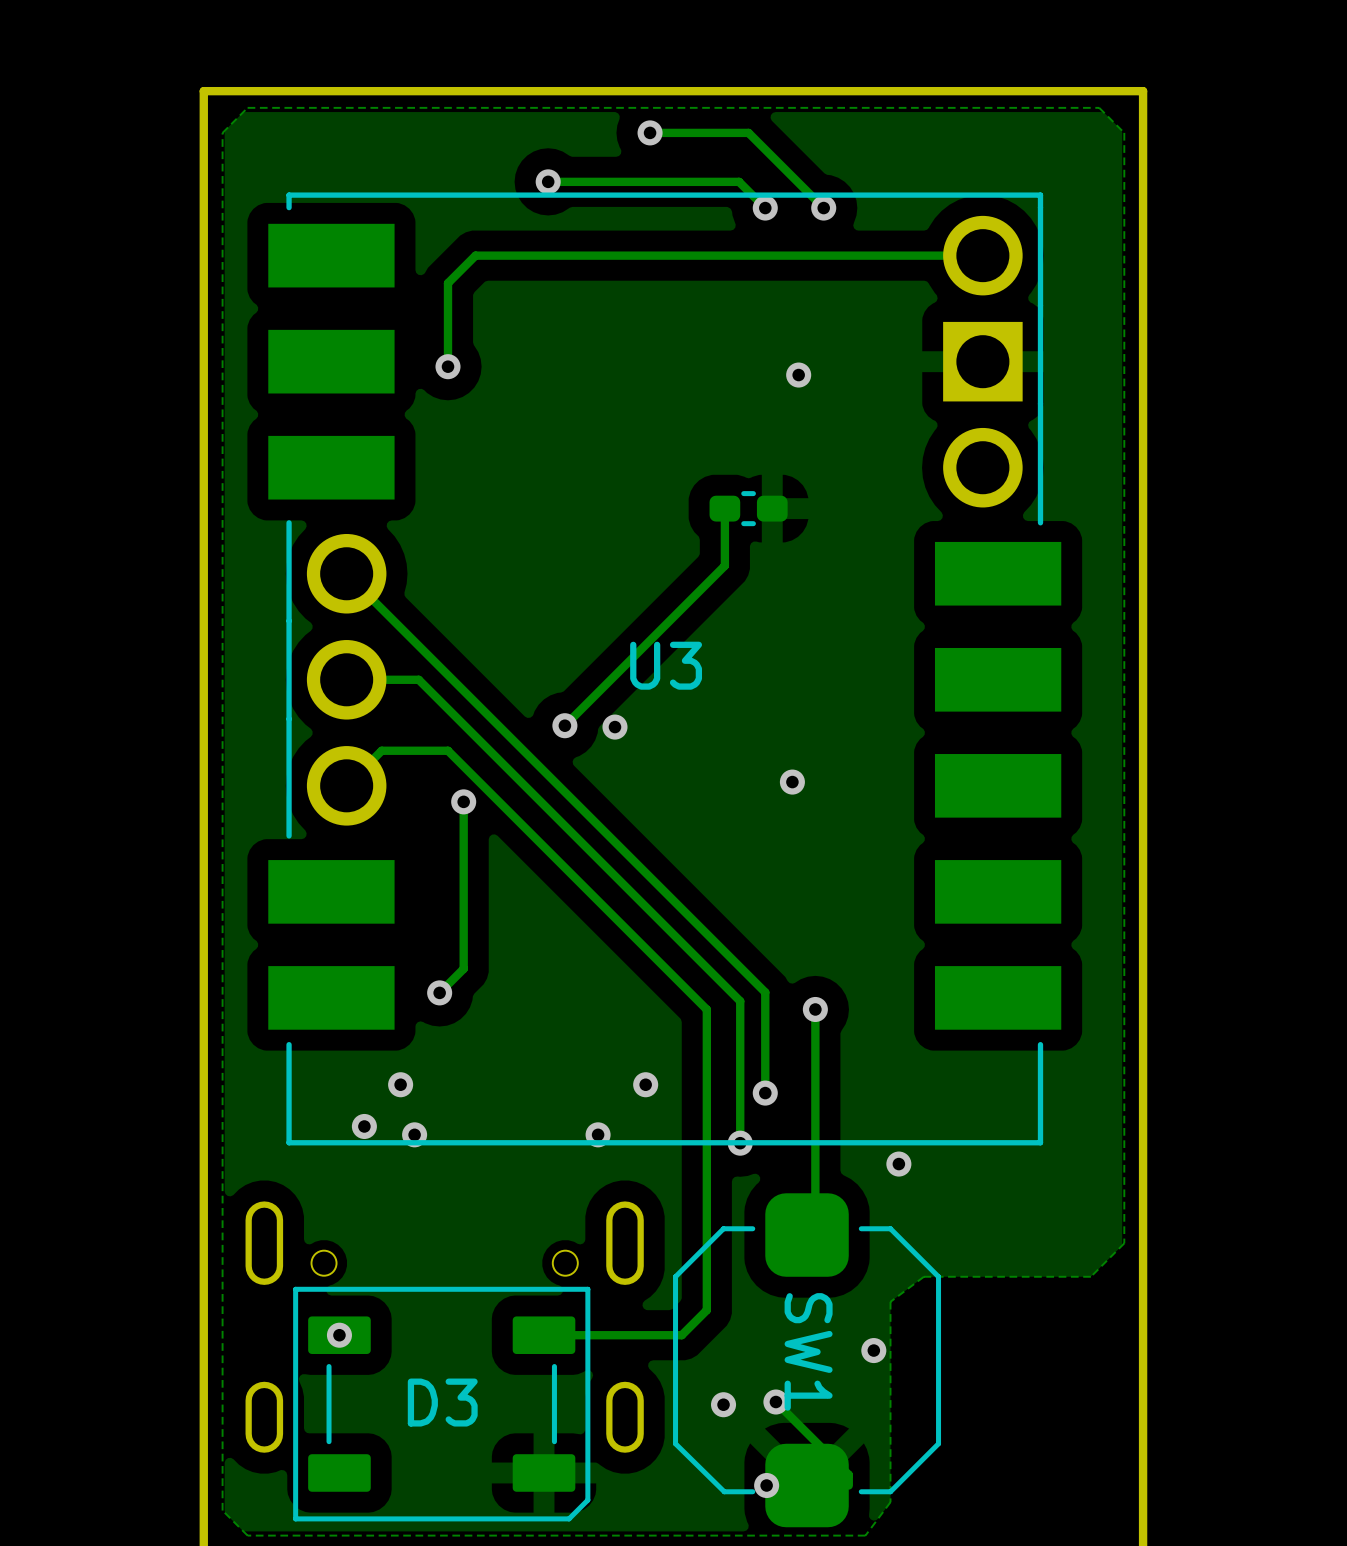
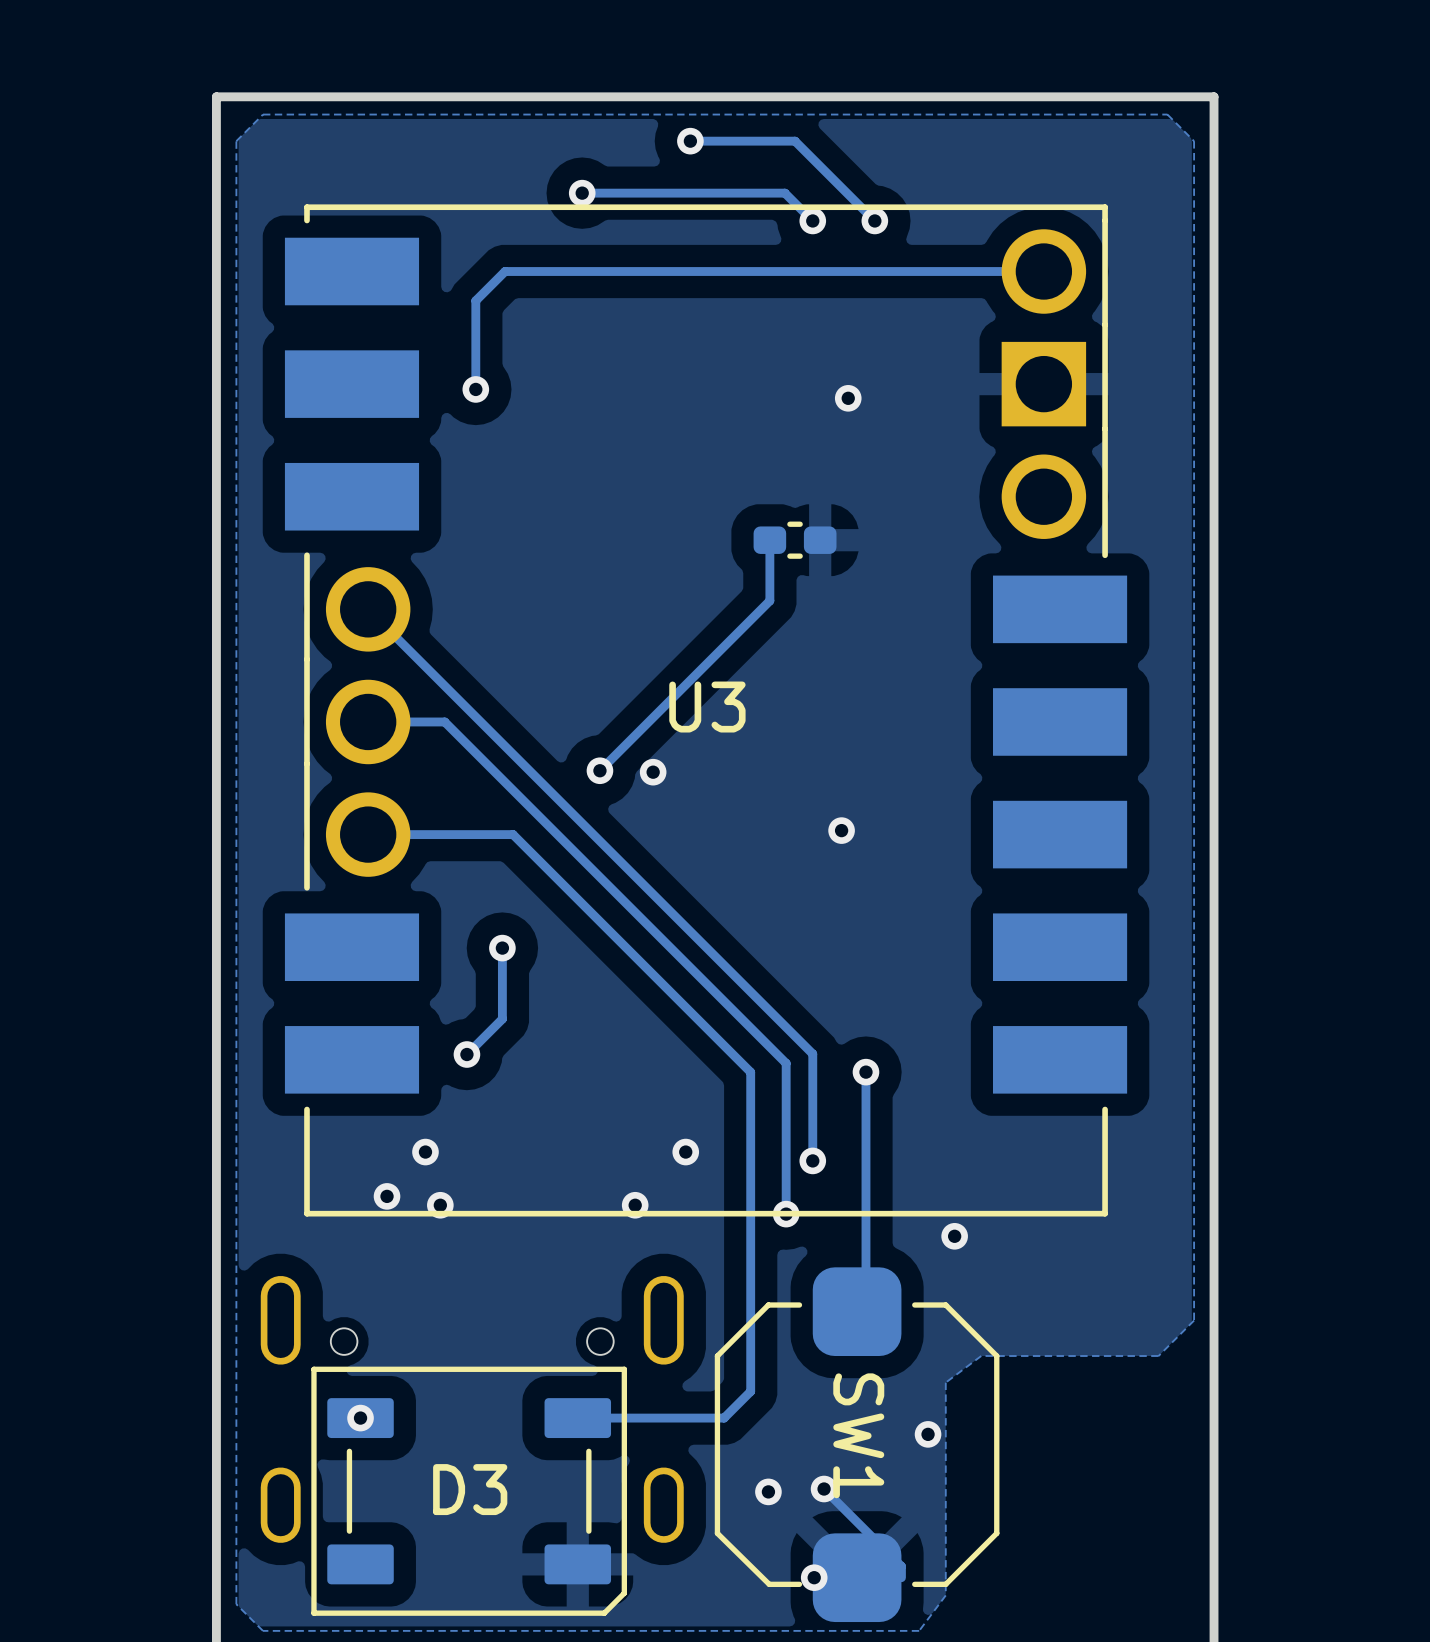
track: (483, 785) (448, 750) (381, 750) (346, 785) -> (513, 834) (368, 834)
track: (463, 801) (463, 968) -> (502, 948) (502, 1019) (492, 1028)
via position: (463, 801) -> (502, 948)

